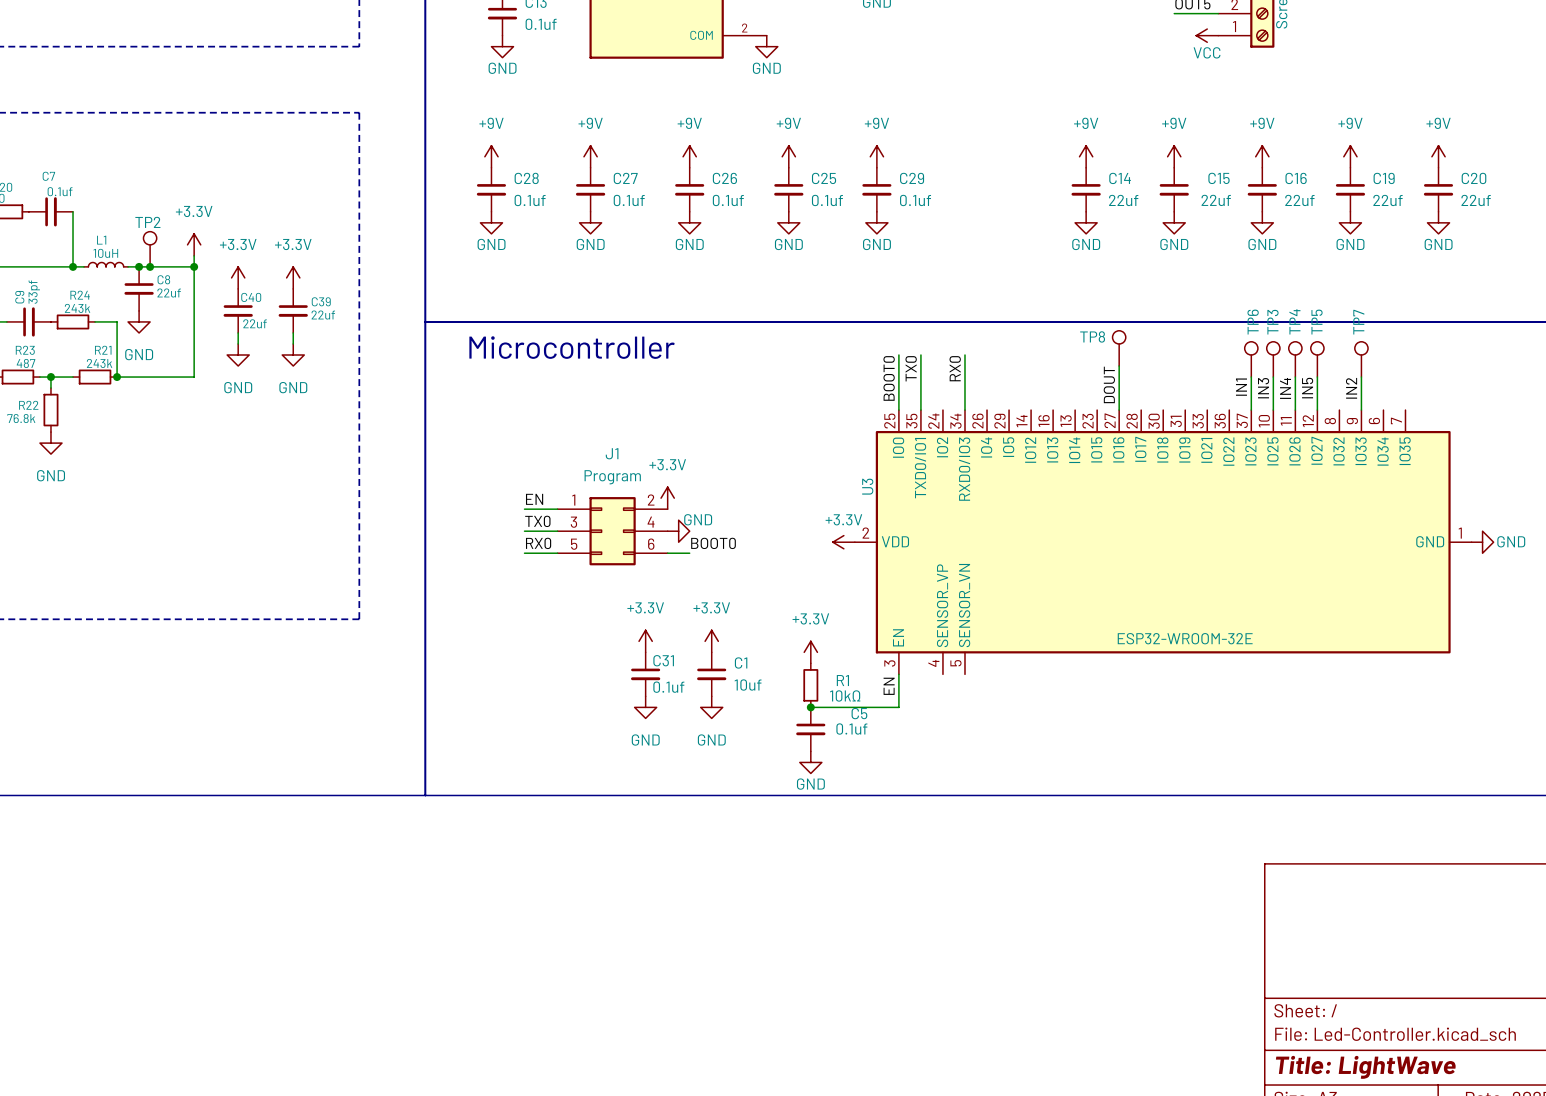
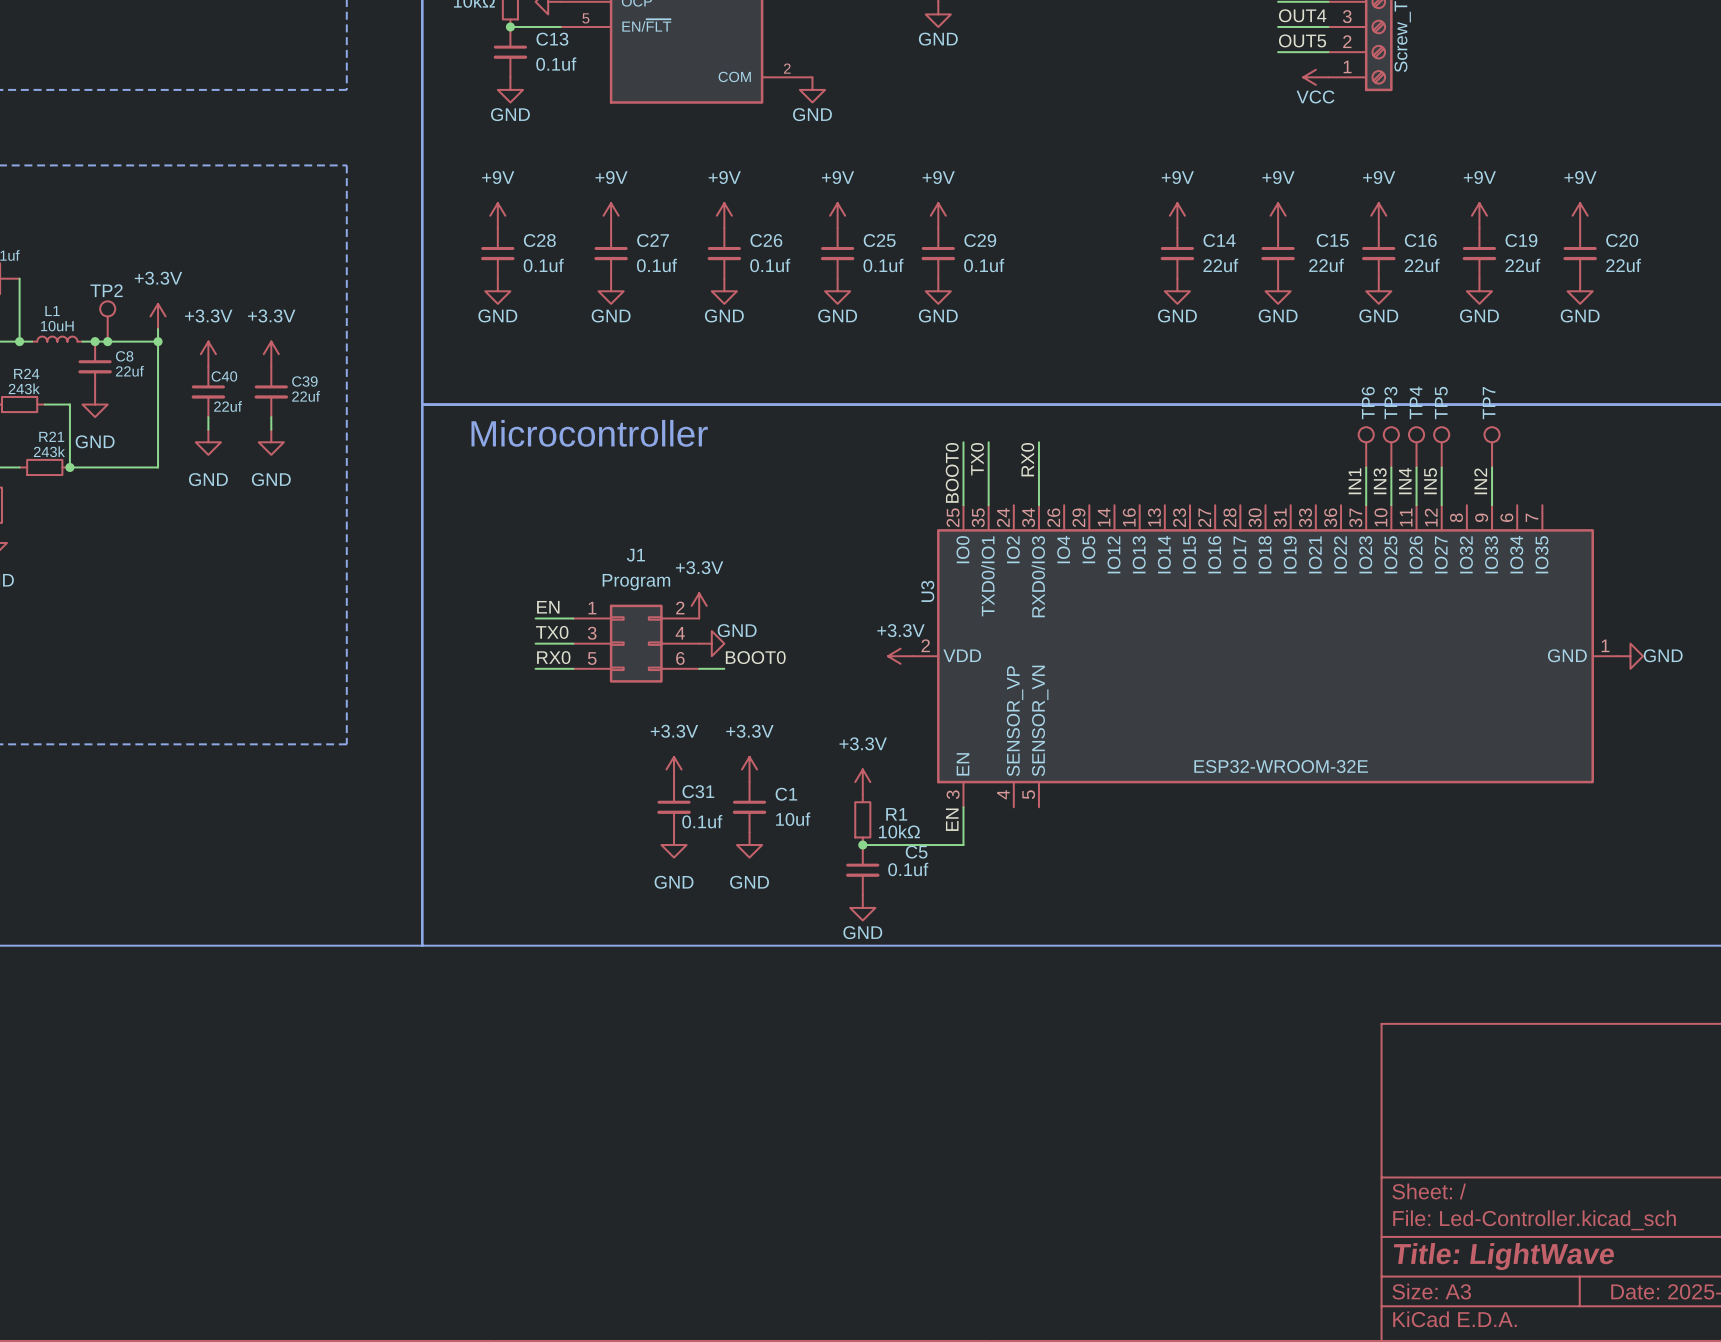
TP8: (1119, 348) -> none
wire: (1119, 366) (1119, 410) -> none
label: DOUT (1109, 384) -> none

